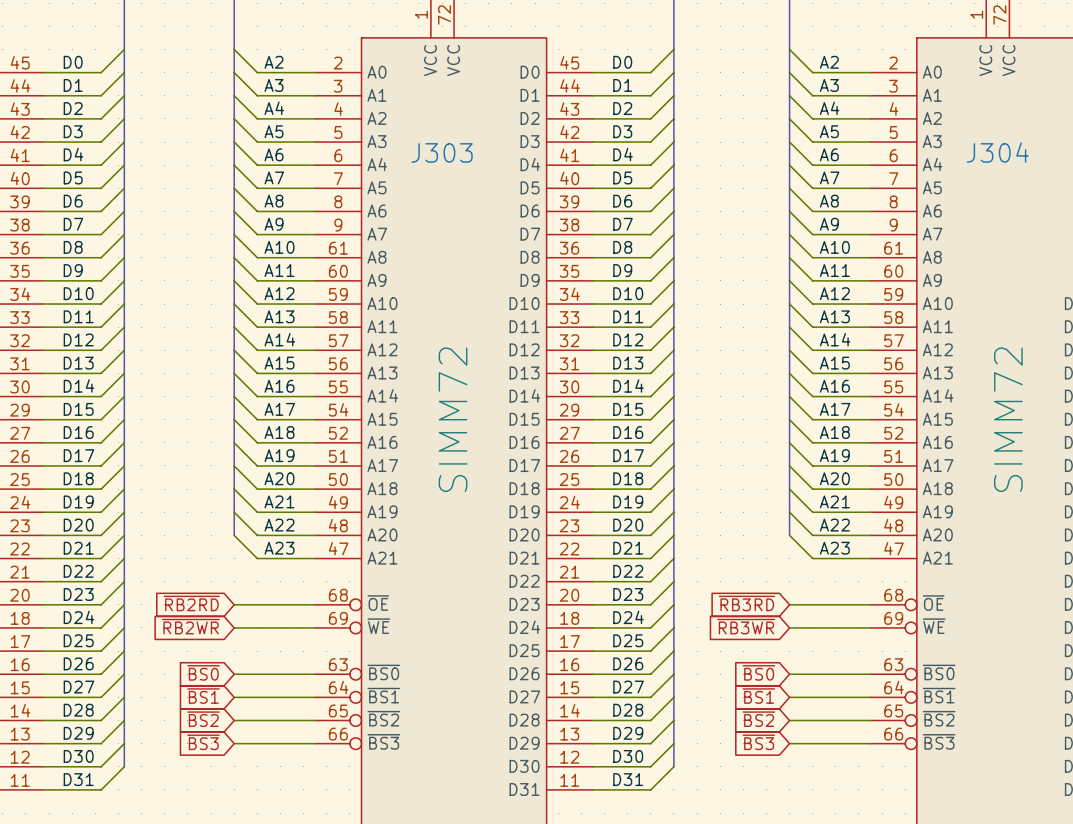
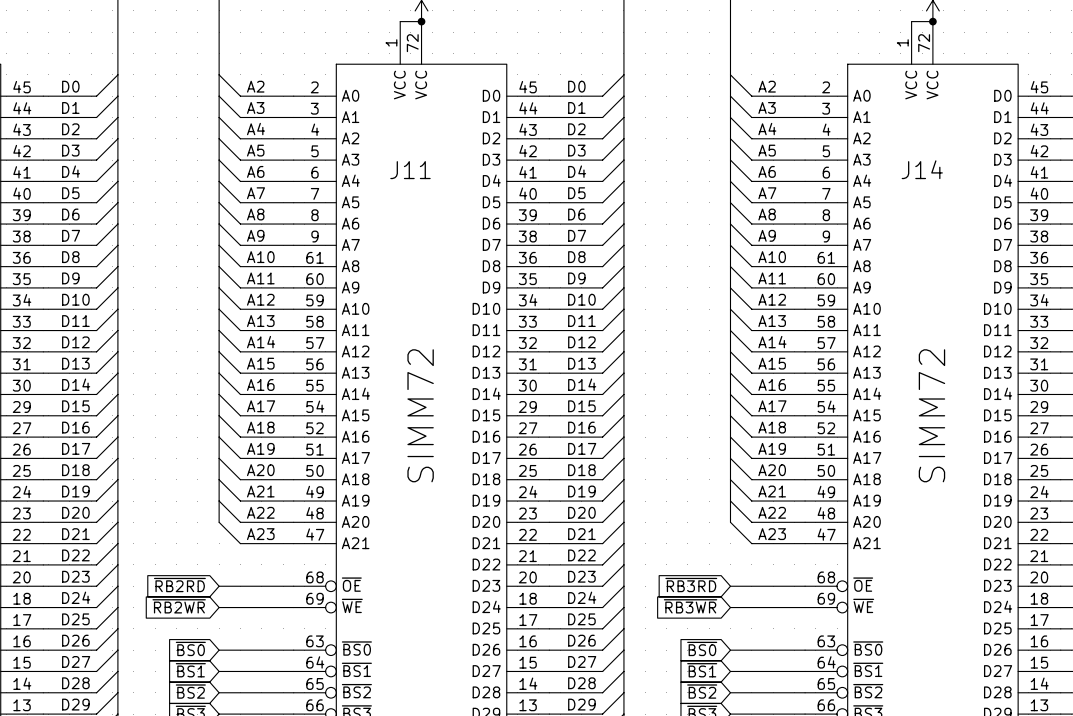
J303 name: J303 (442, 152) -> J11 (410, 170)
J304 name: J304 (997, 152) -> J14 (922, 169)

